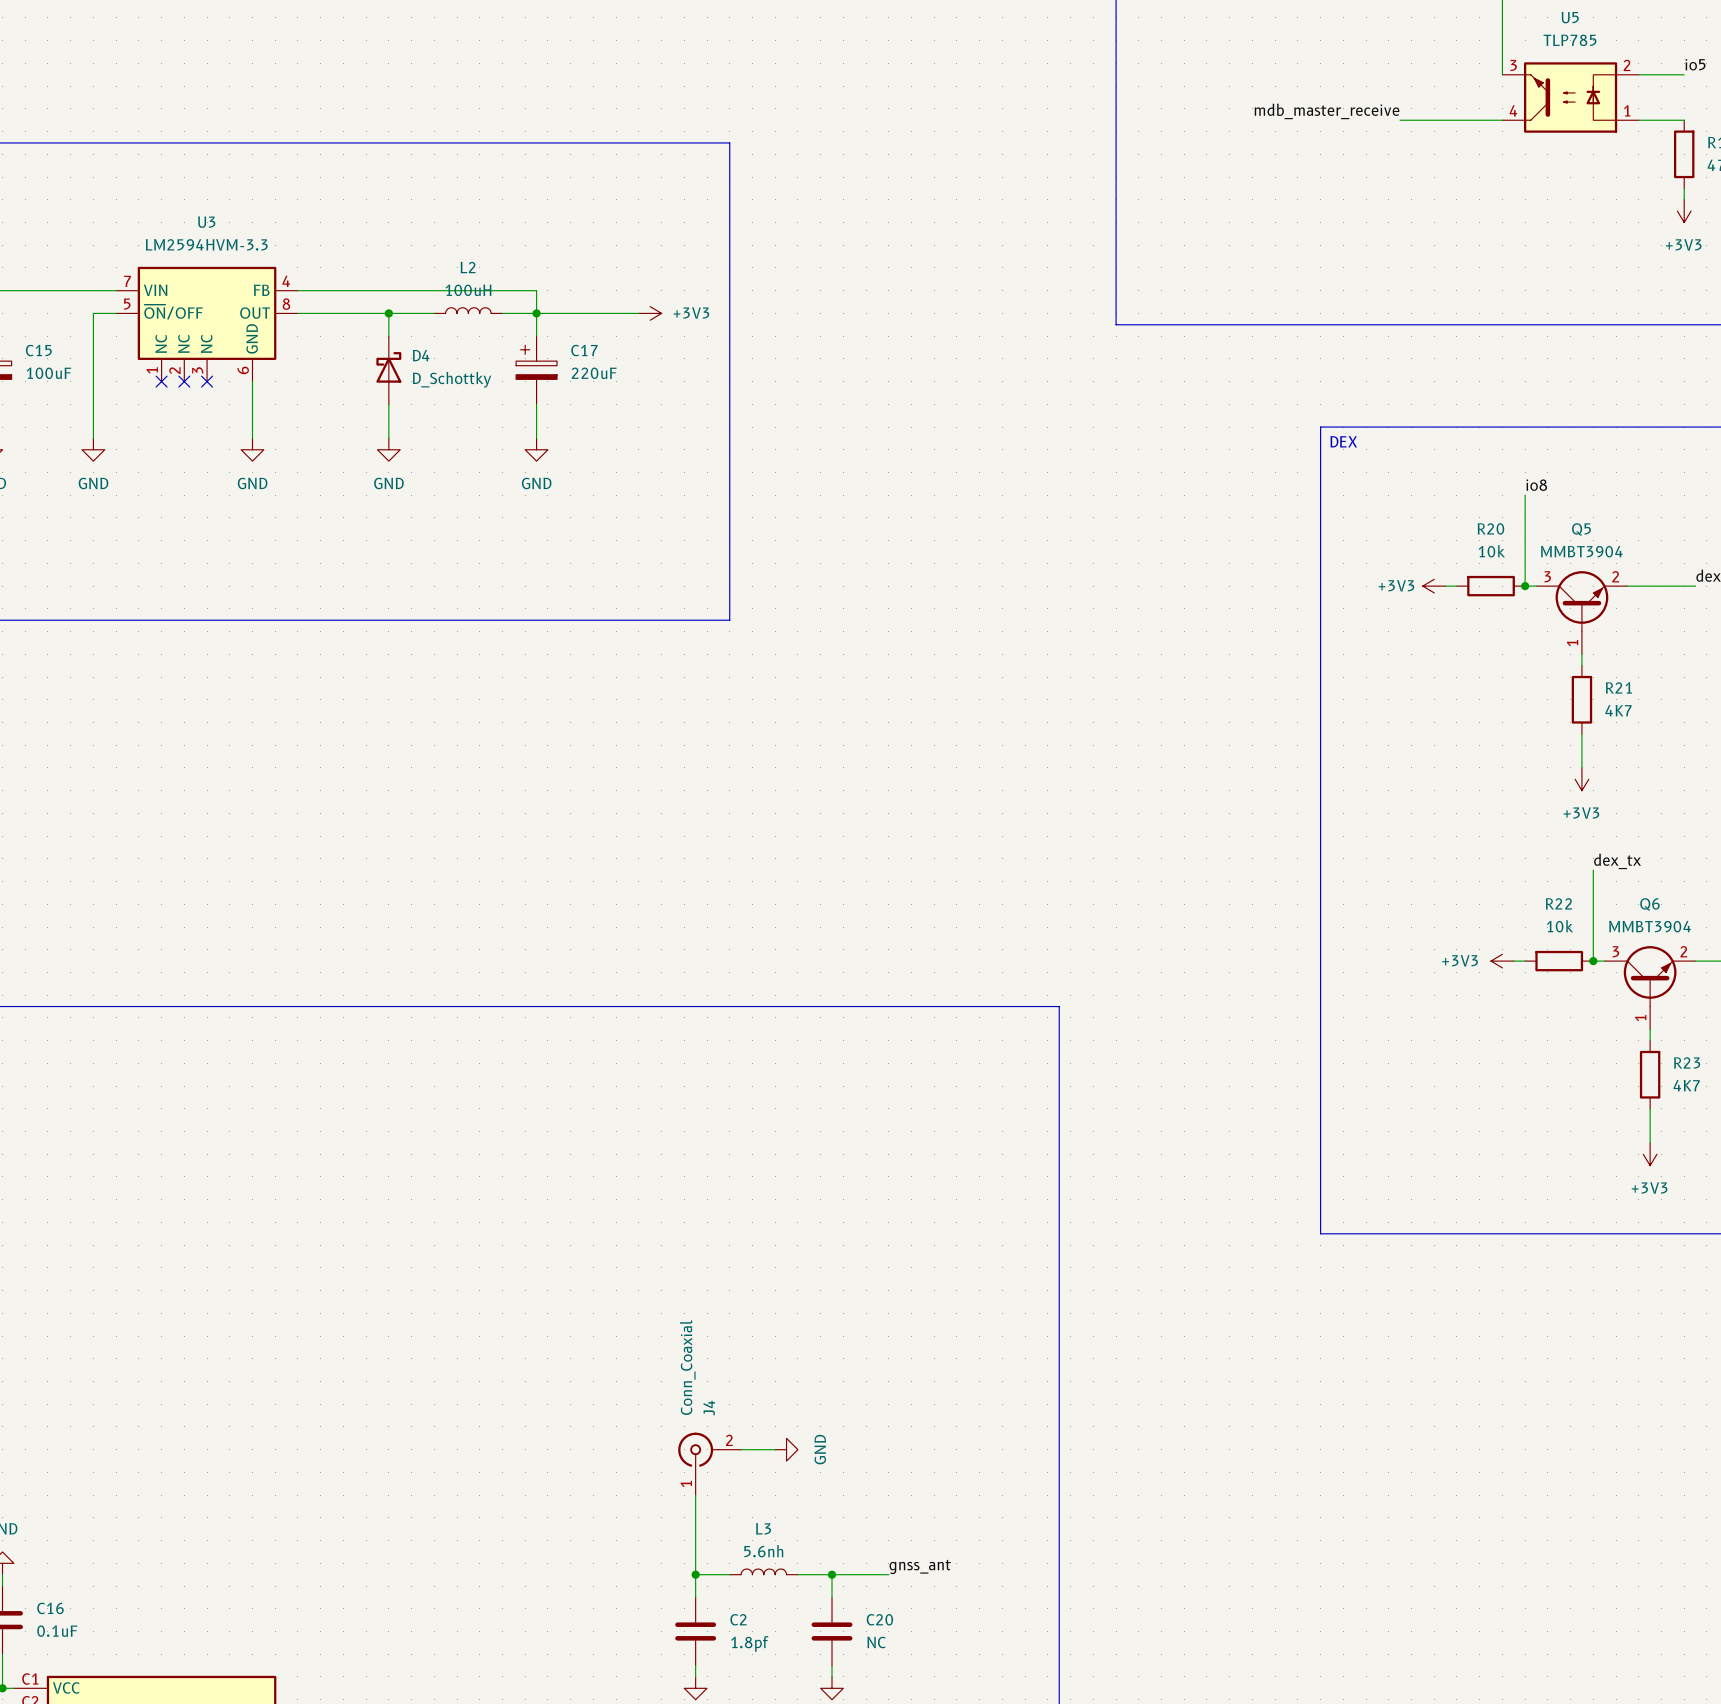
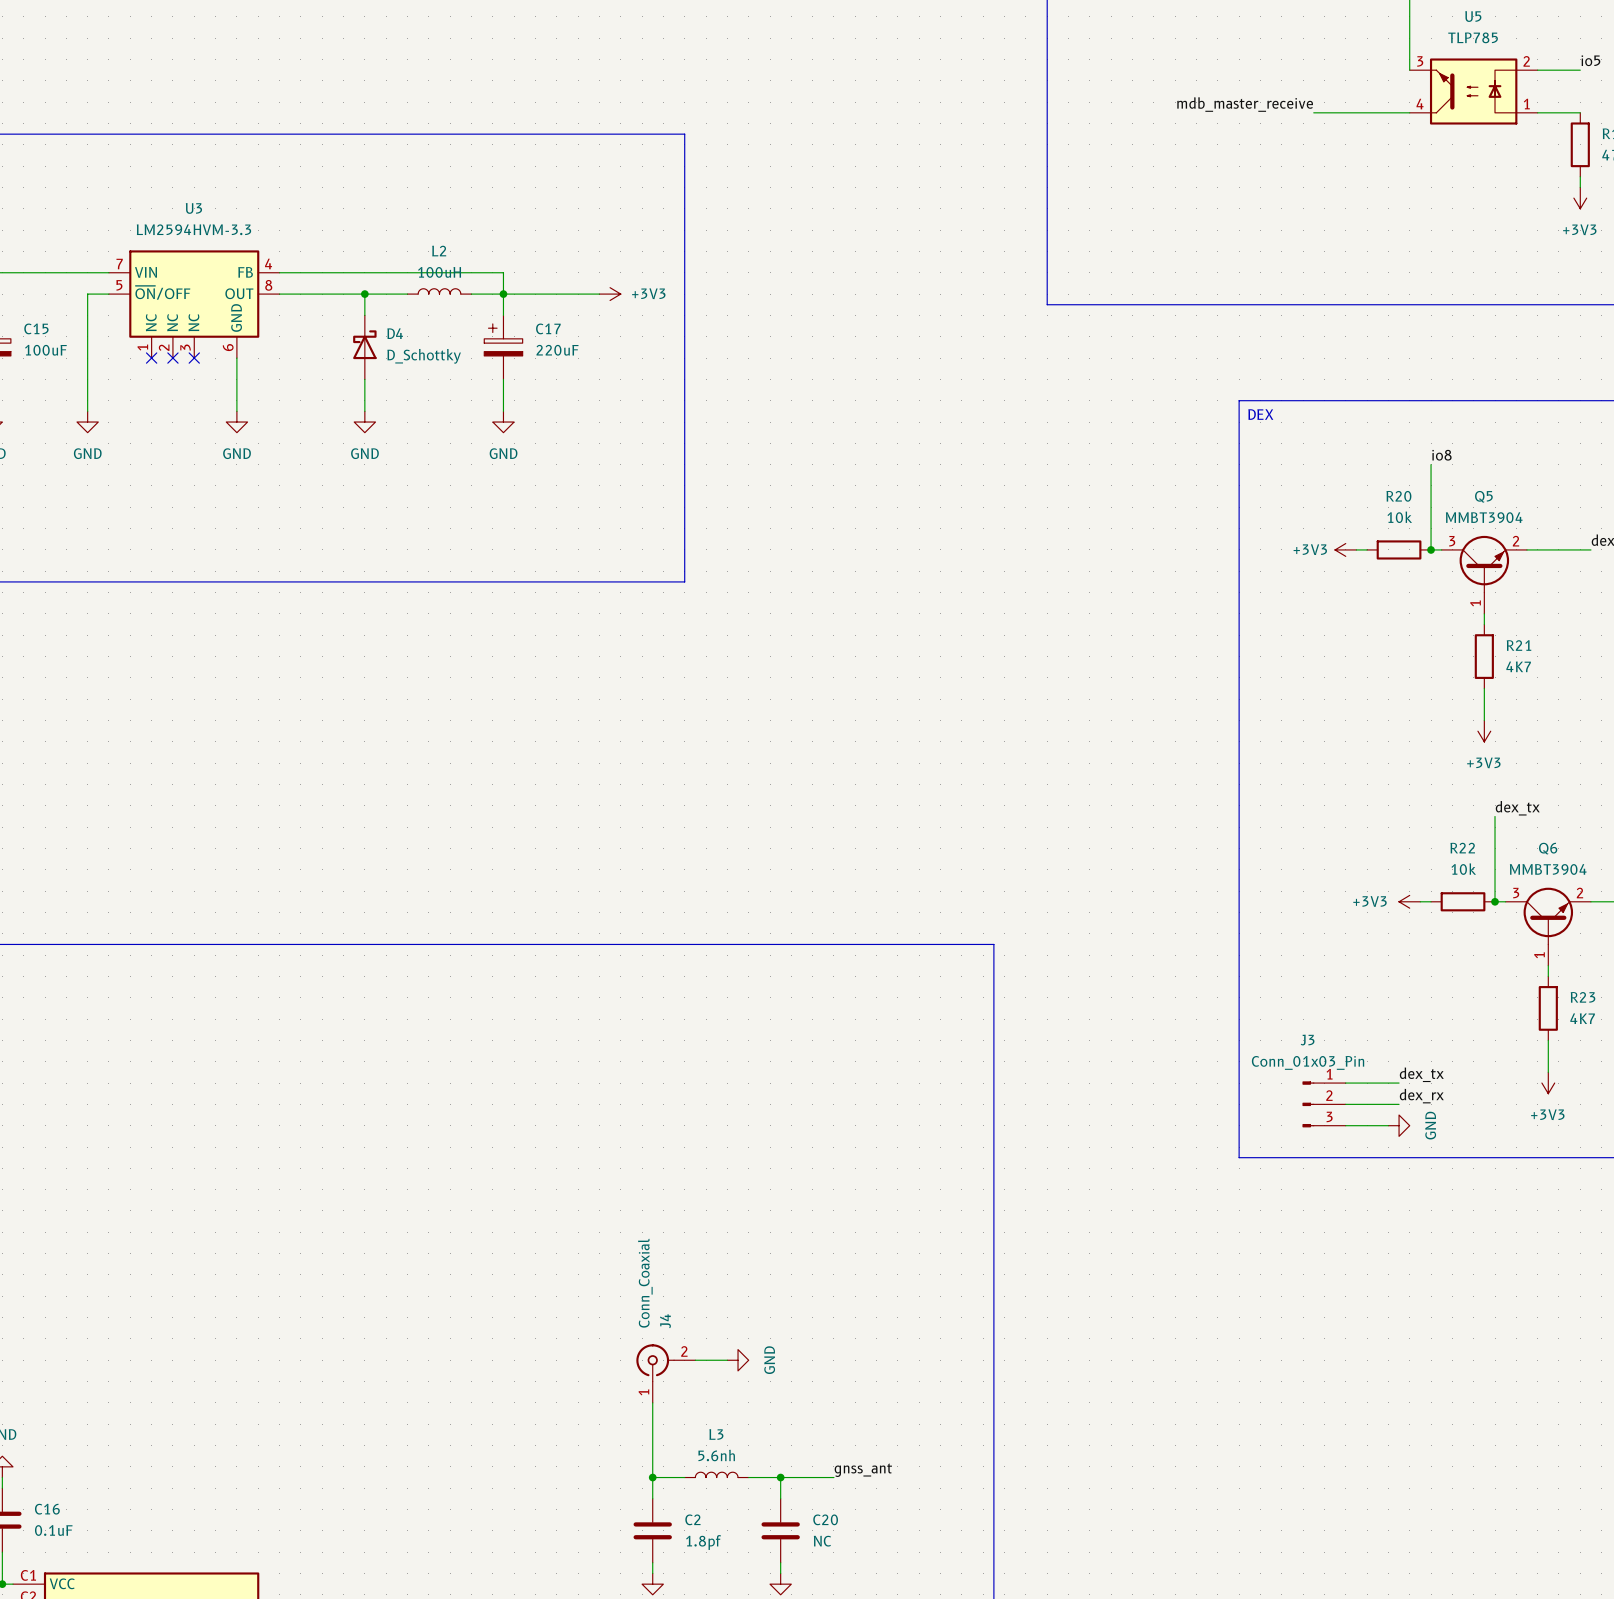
label: none -> dex_tx (1421, 1074)
wire: none -> (1345, 1083) (1399, 1083)
label: none -> dex_rx (1421, 1096)
J3: none -> Conn_01x03_Pin (1324, 1104)
wire: none -> (1345, 1104) (1399, 1104)
wire: none -> (1345, 1125) (1388, 1125)
power symbol: none -> GND (1399, 1125)

